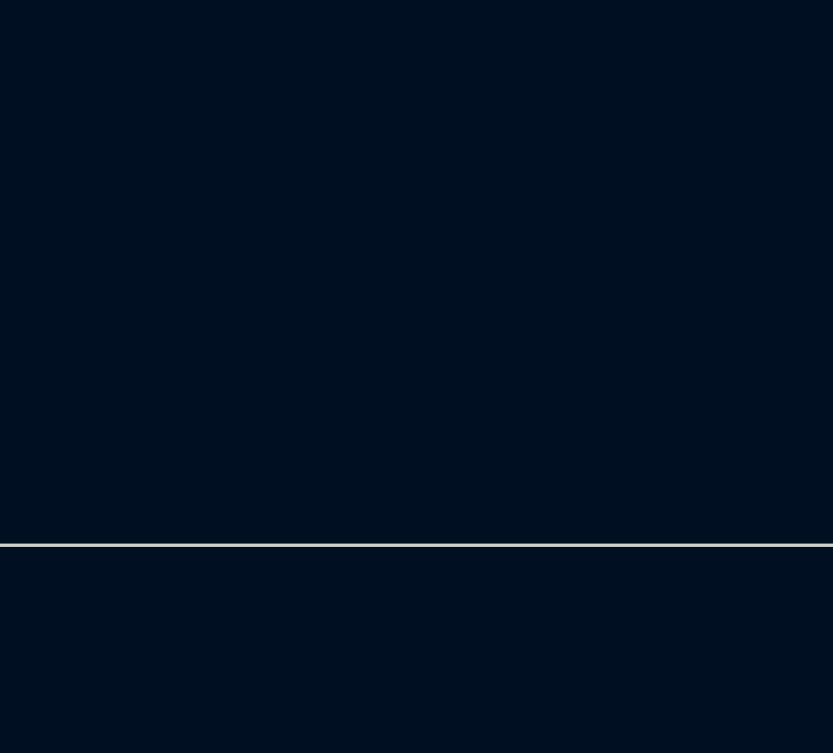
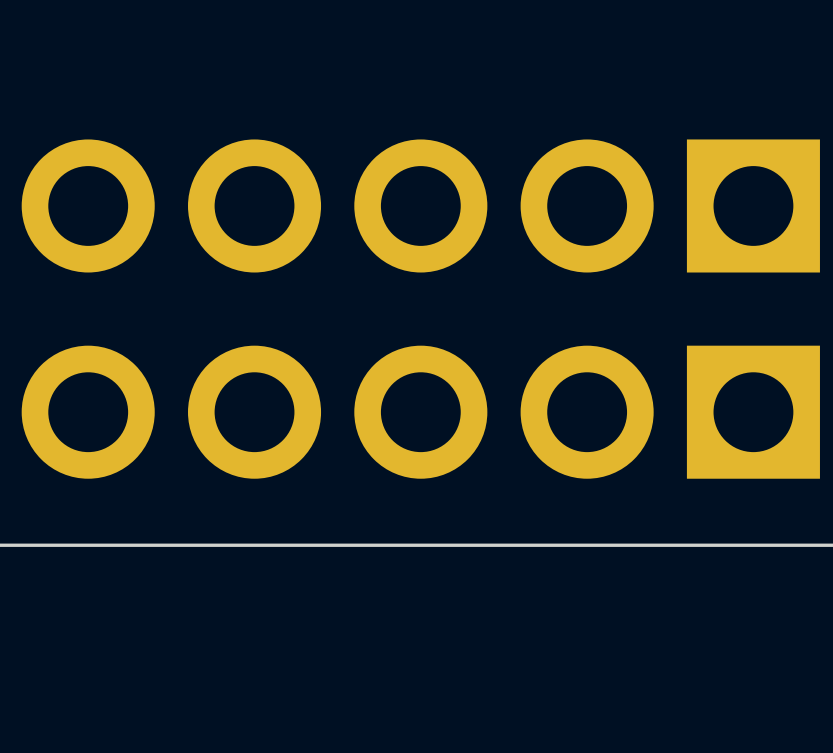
part: none -> (420, 309)

